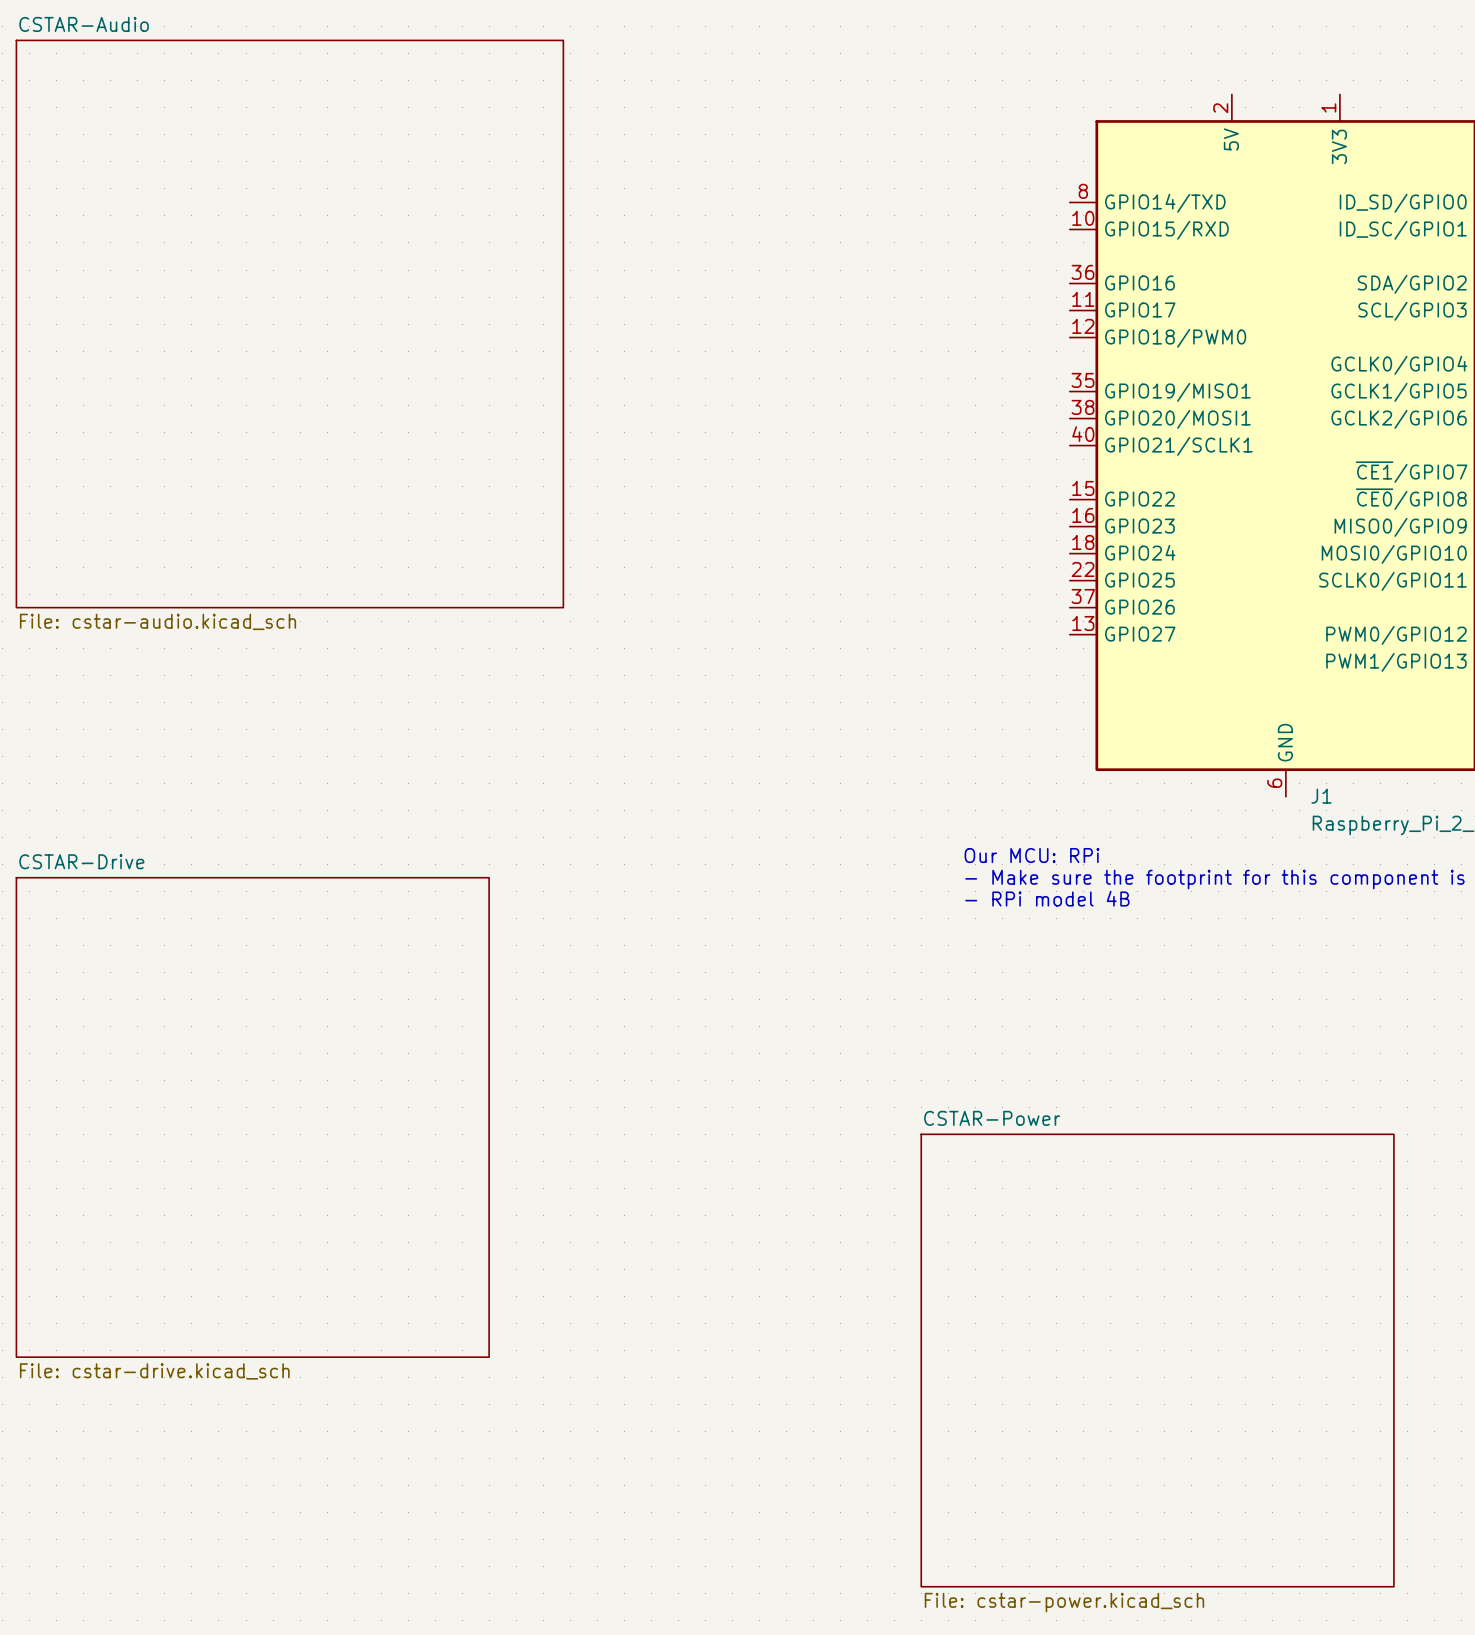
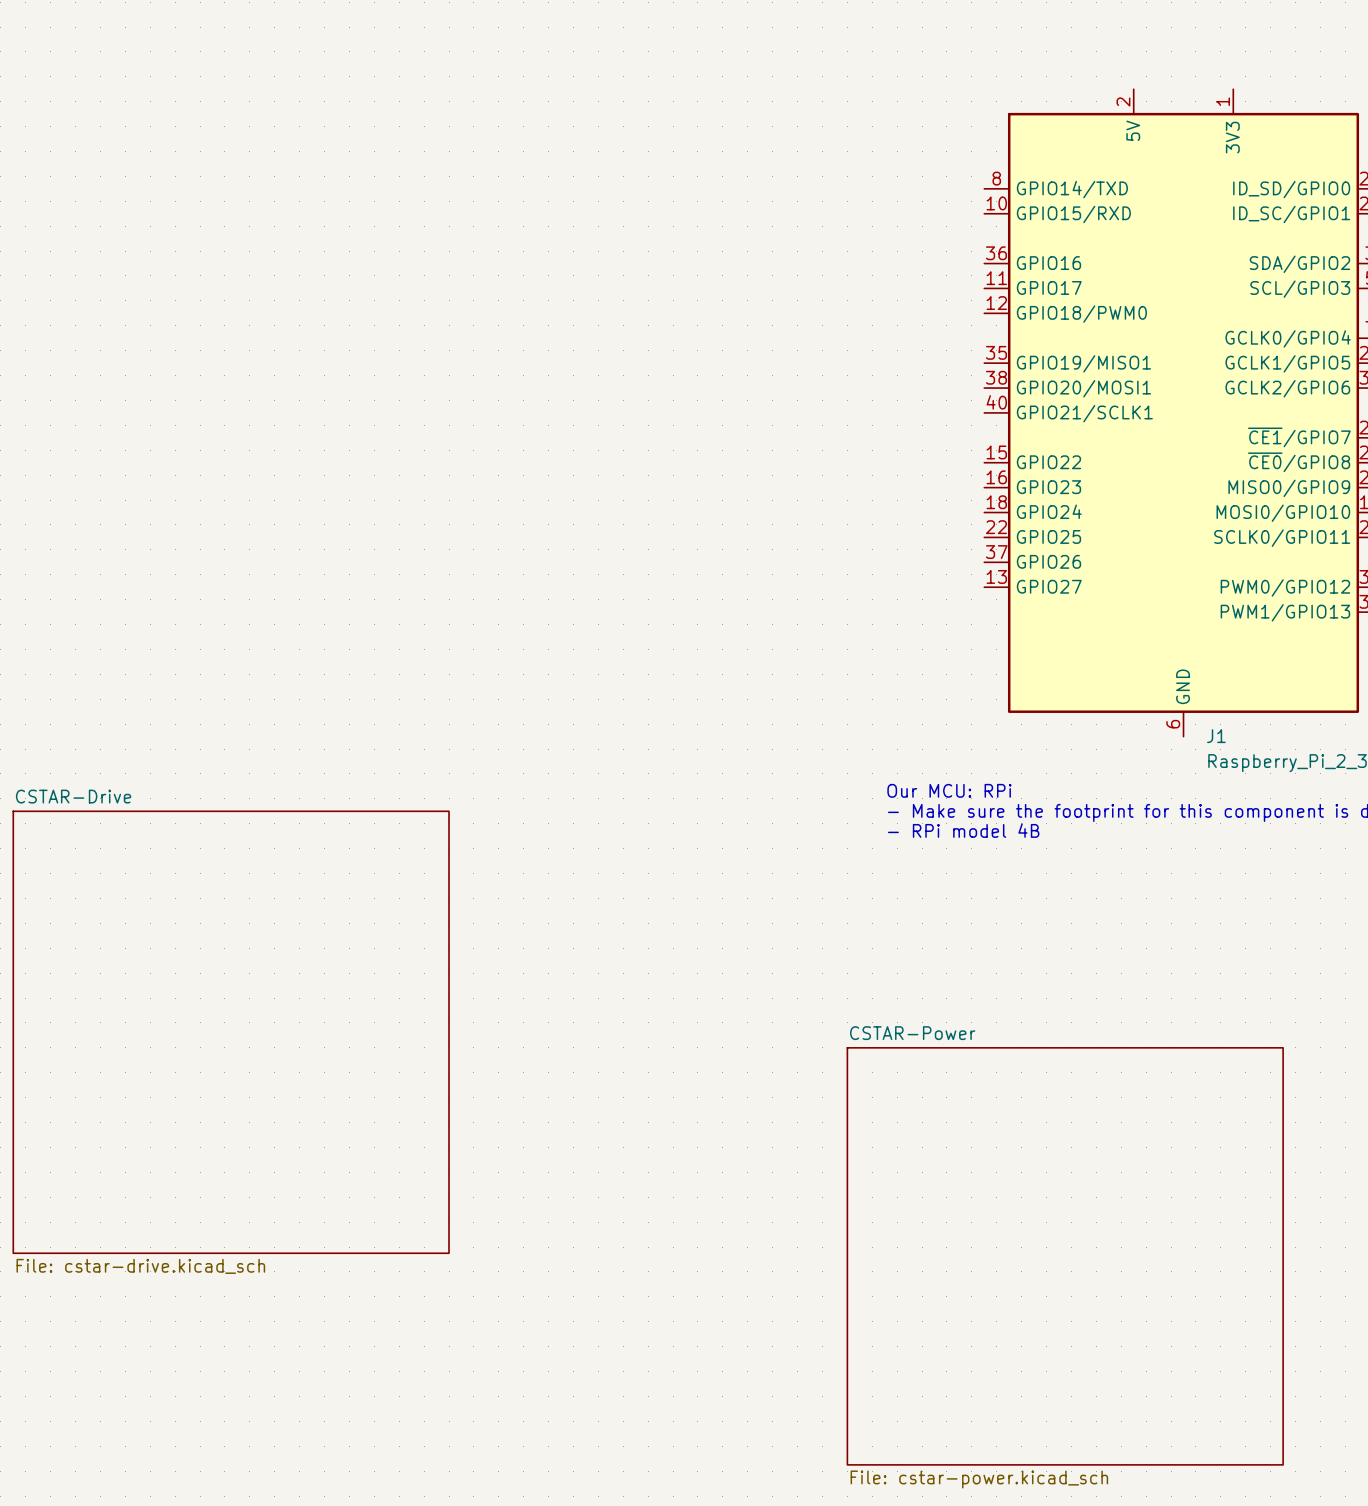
sheet CSTAR-Audio: File: cstar-audio.kicad_sch (289, 324) -> none

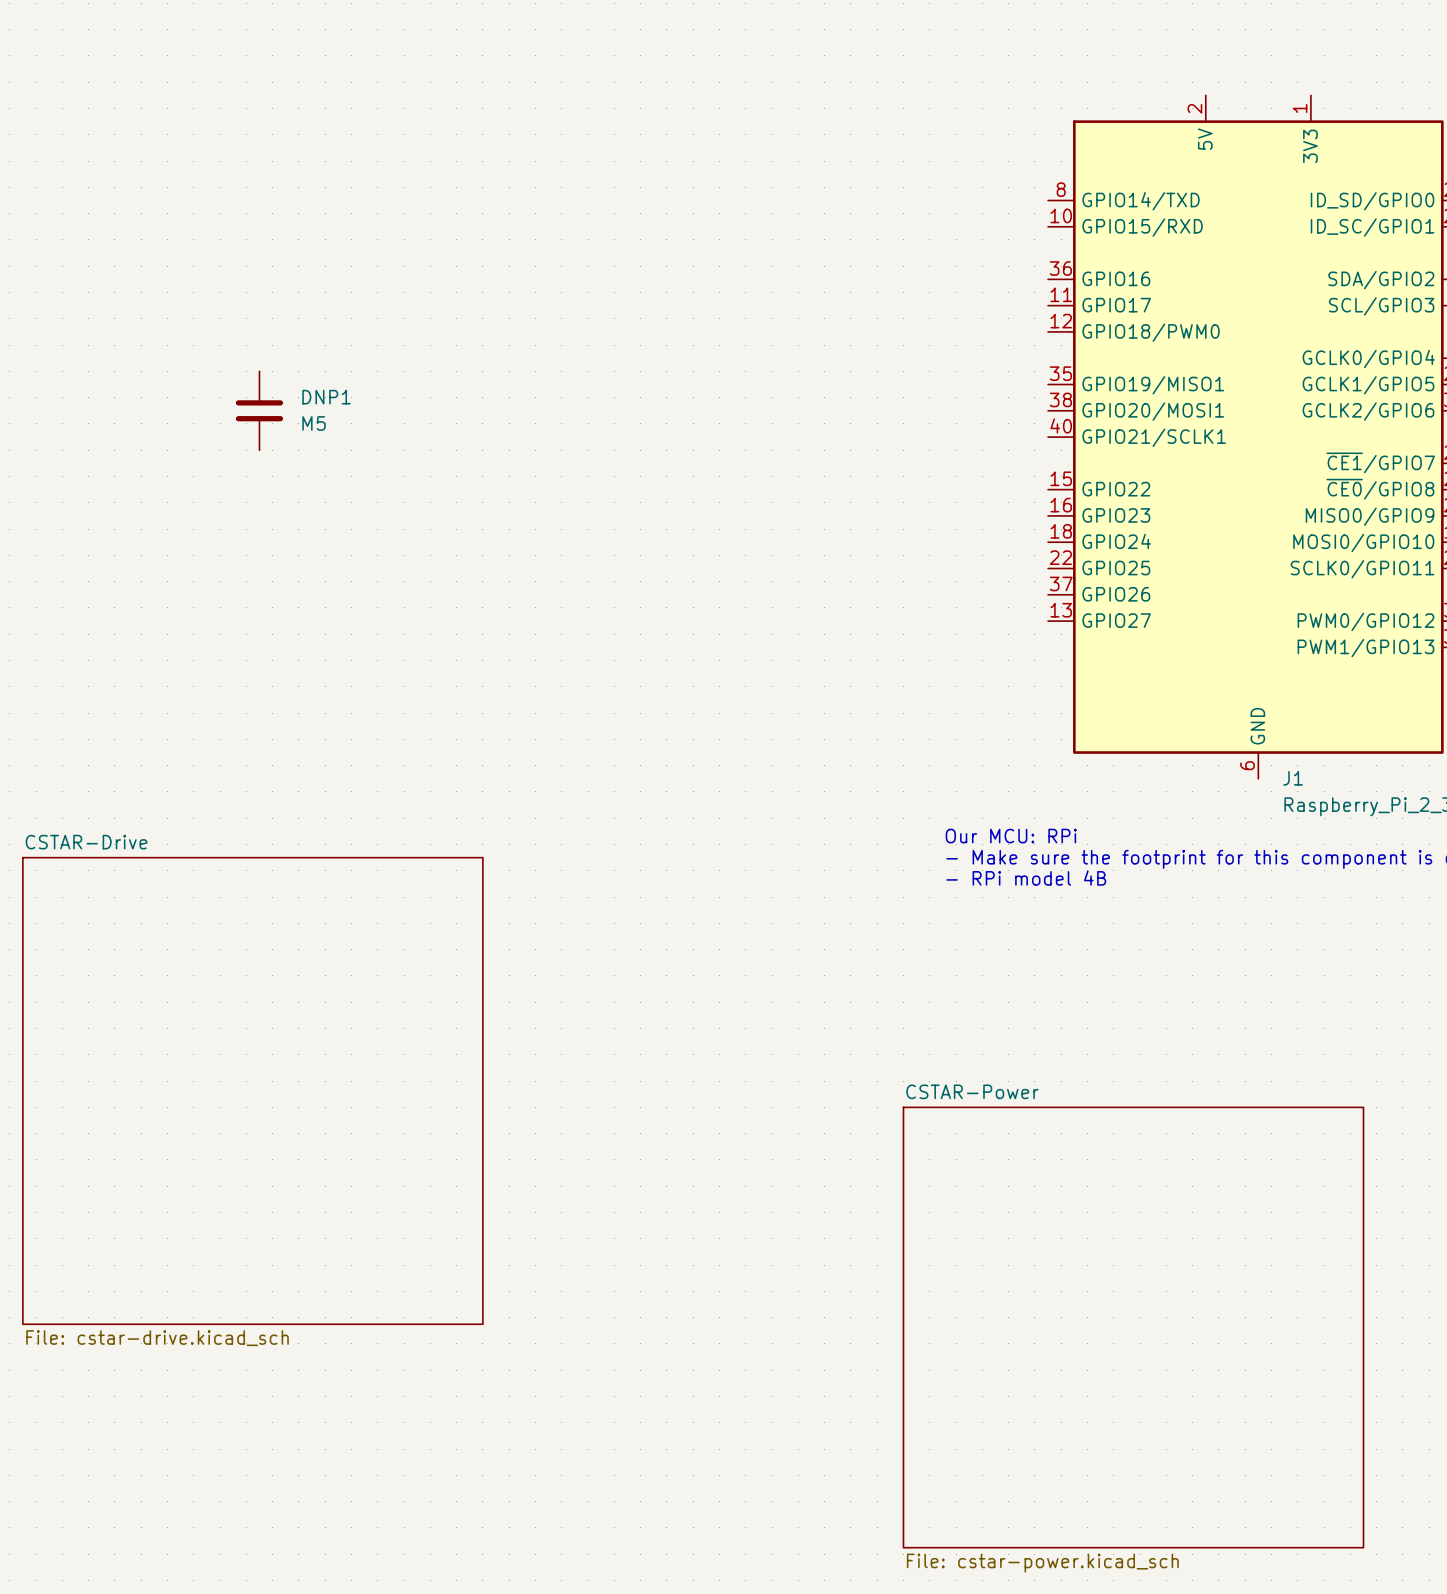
DNP1: none -> M5 (259, 410)

